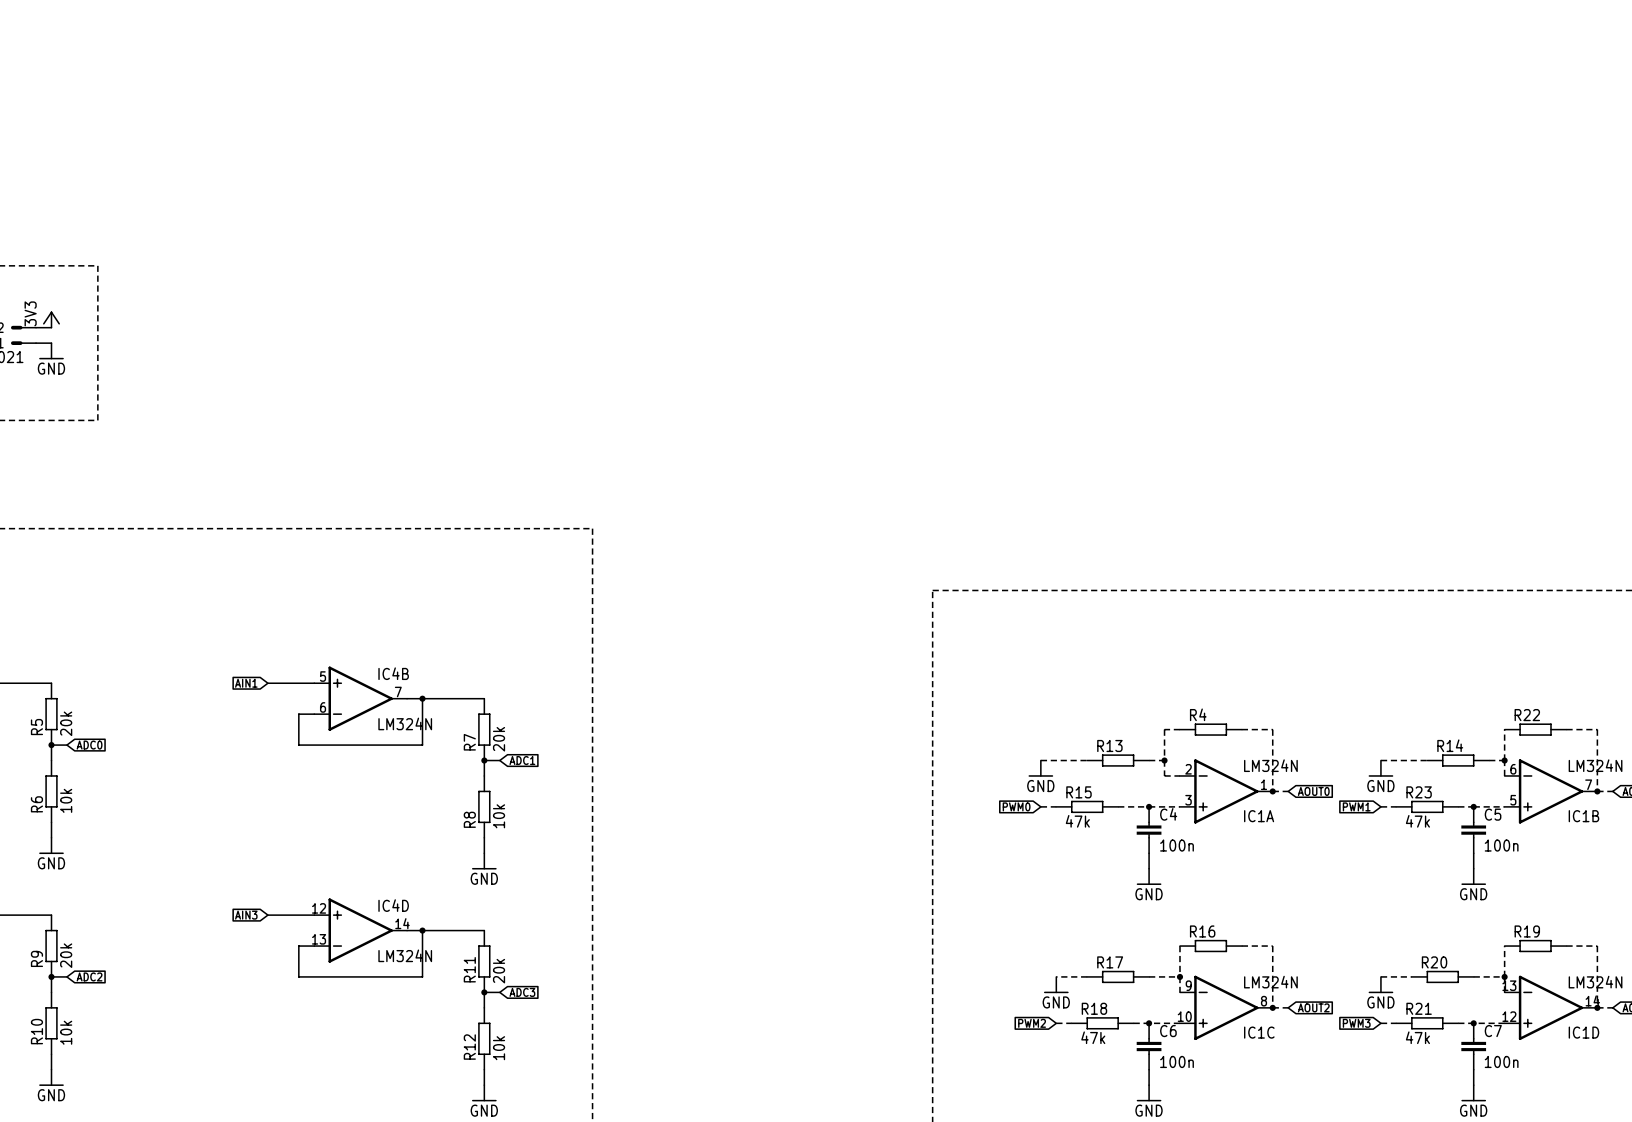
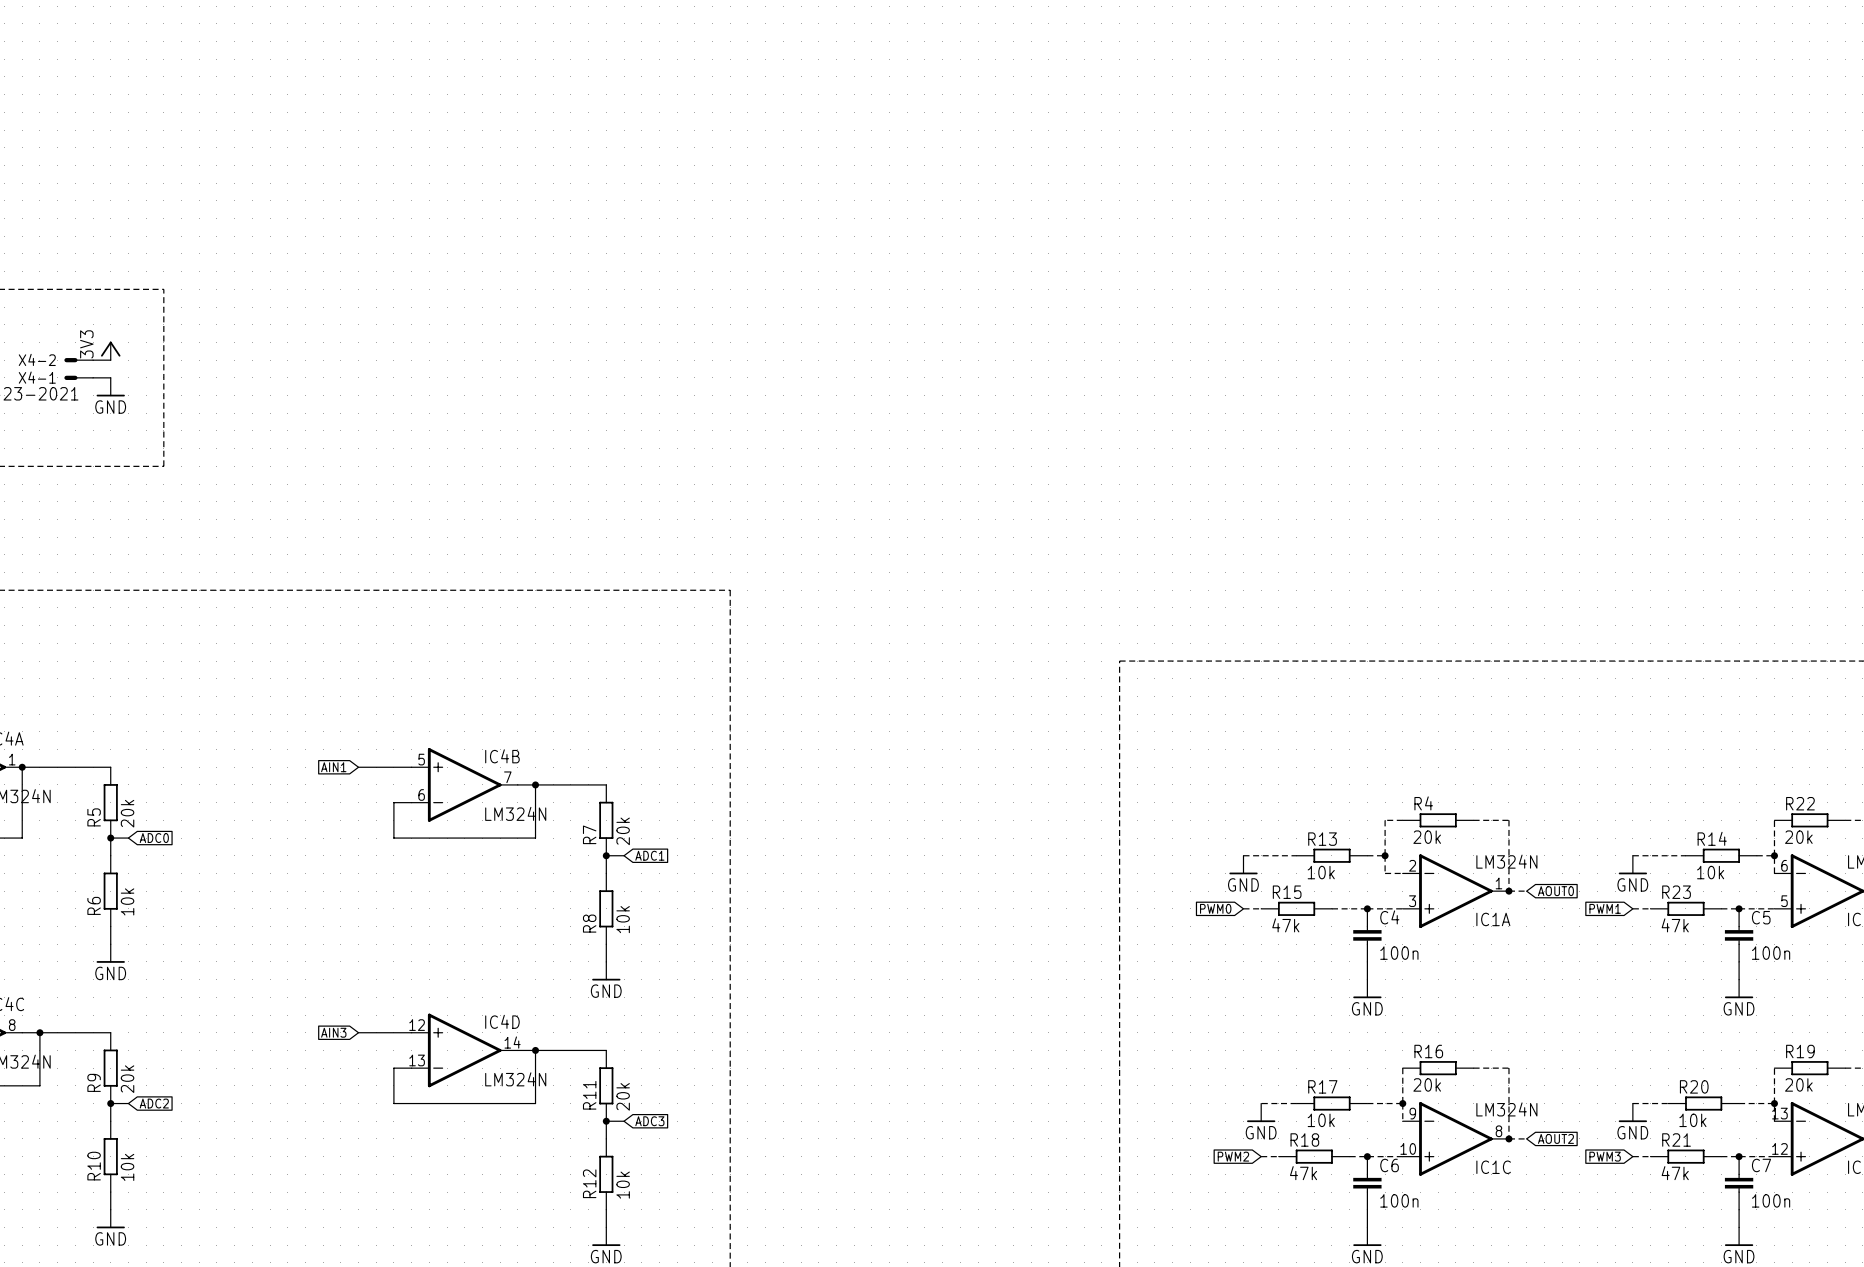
R4 value: none -> 20k (1427, 837)
R22 value: none -> 20k (1798, 837)
R13 value: none -> 10k (1321, 872)
R14 value: none -> 10k (1710, 872)
R16 value: none -> 20k (1427, 1084)
R19 value: none -> 20k (1798, 1084)
R17 value: none -> 10k (1321, 1120)
R20 value: none -> 10k (1692, 1120)

